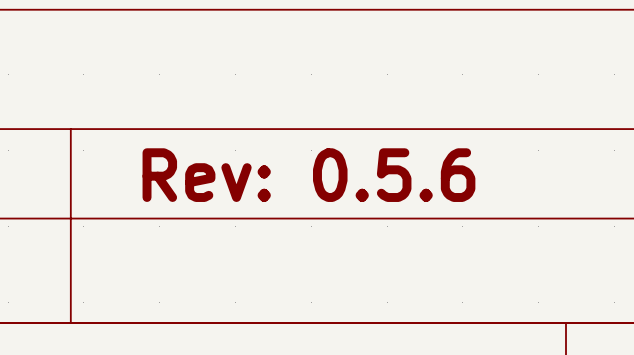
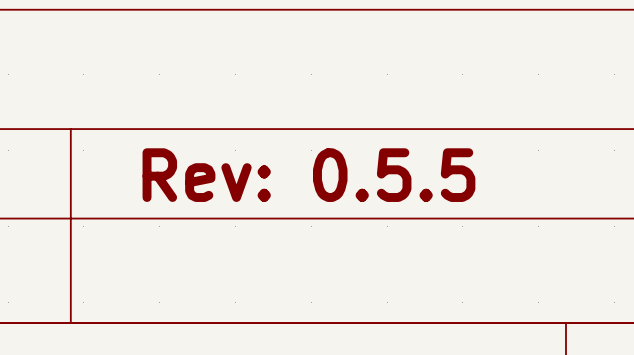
title block: Rev: 0.5.6 (308, 175) -> Rev: 0.5.5 (308, 175)

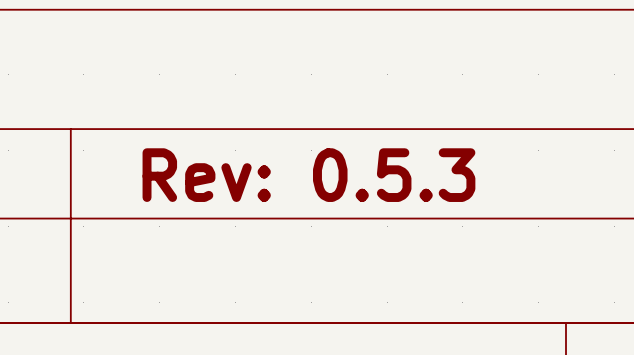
title block: Rev: 0.5.5 (308, 175) -> Rev: 0.5.3 (308, 175)

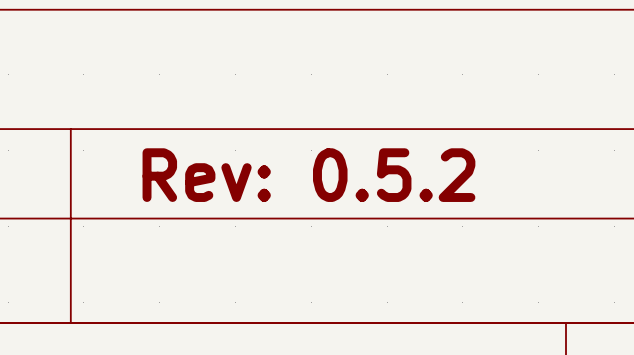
title block: Rev: 0.5.3 (308, 175) -> Rev: 0.5.2 (308, 175)

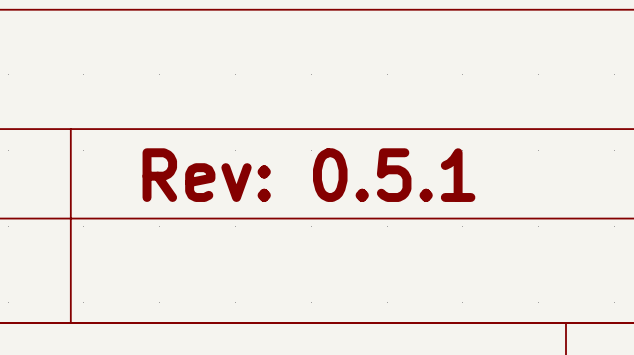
title block: Rev: 0.5.2 (308, 175) -> Rev: 0.5.1 (308, 175)

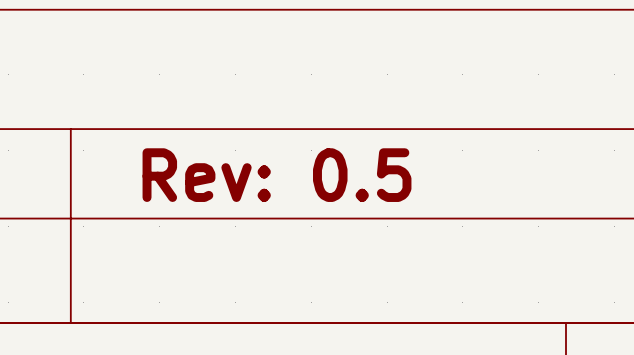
title block: Rev: 0.5.1 (308, 175) -> Rev: 0.5 (276, 175)

